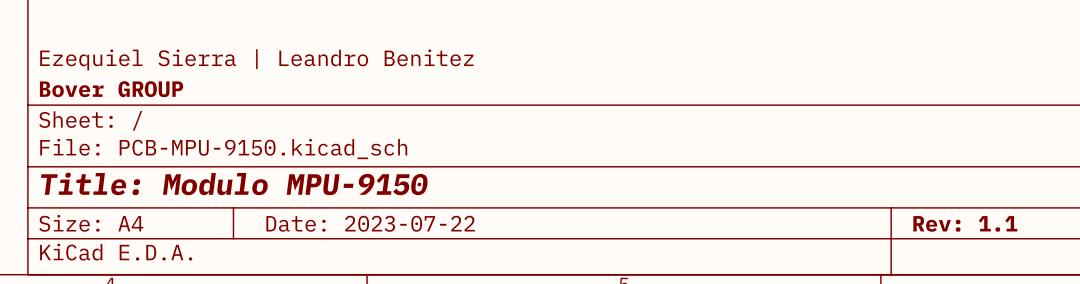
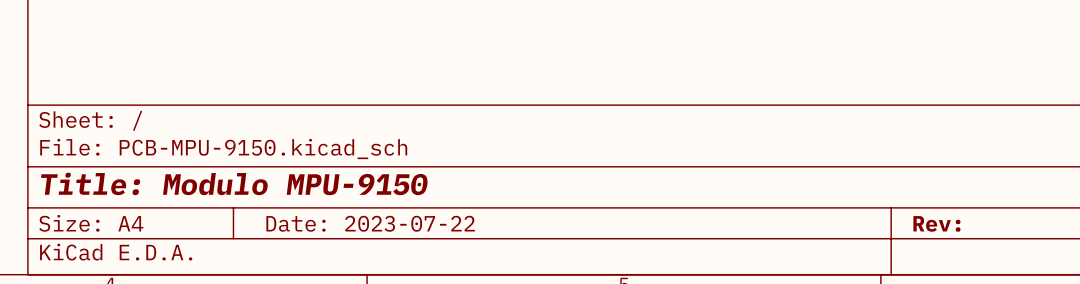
title block: Ezequiel Sierra | Leandro Benitez (256, 59) -> none
title block: Bover GROUP (111, 89) -> none
title block: Rev: 1.1 (965, 223) -> Rev: (936, 223)

